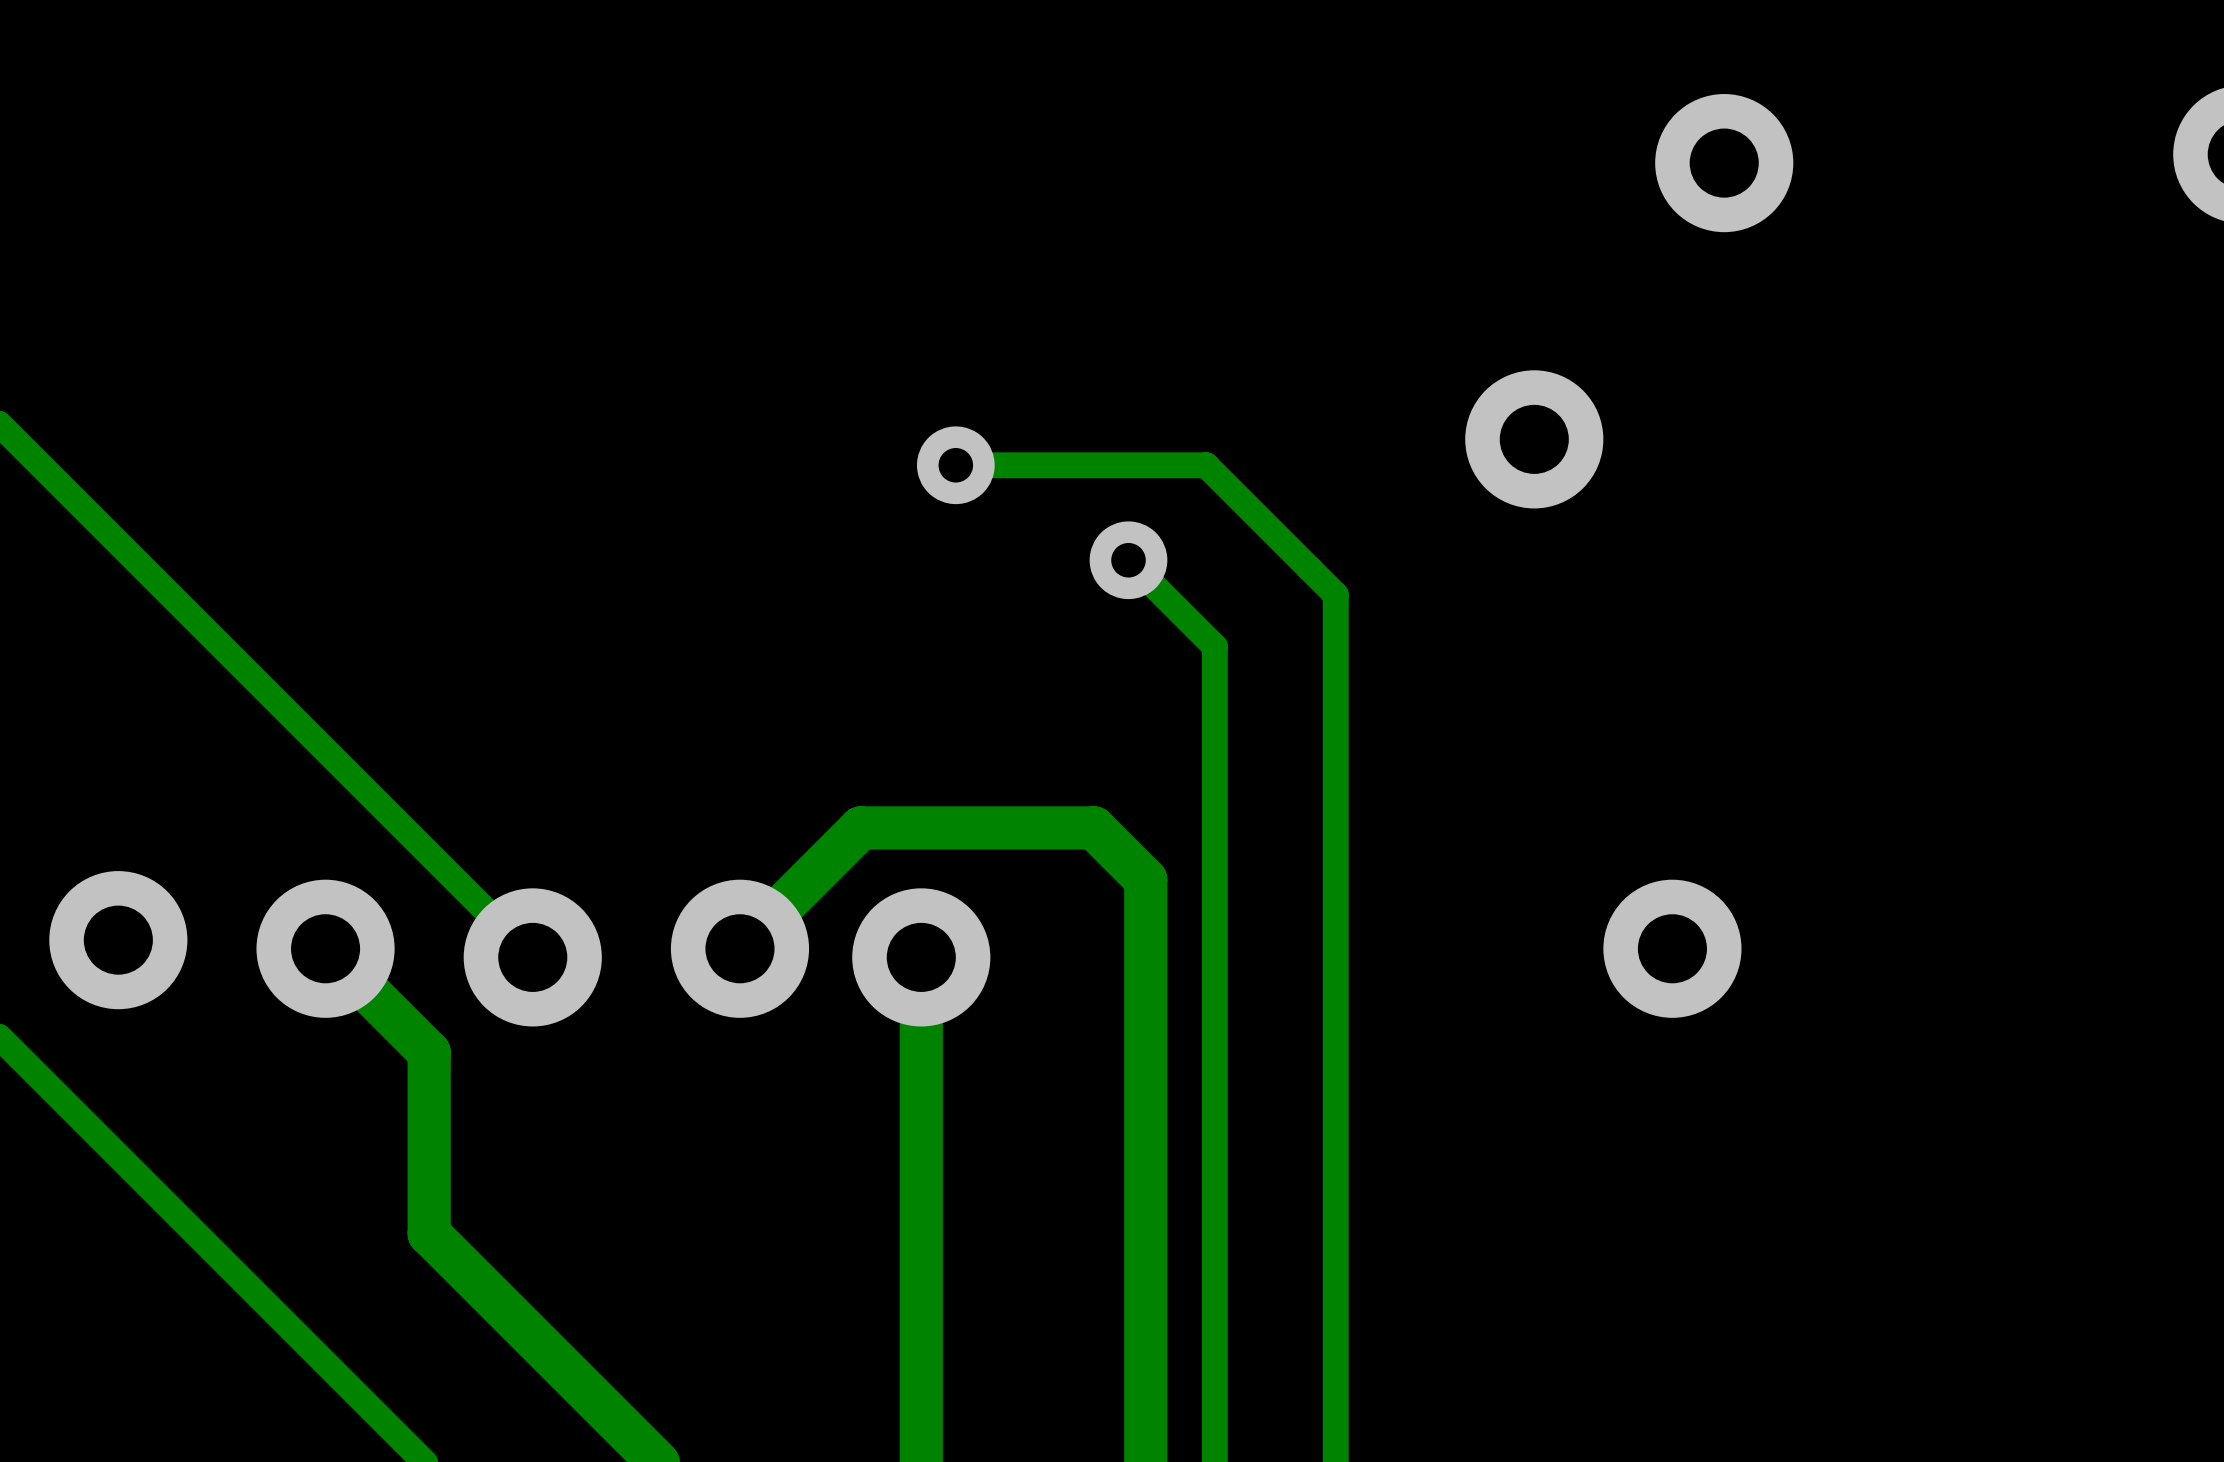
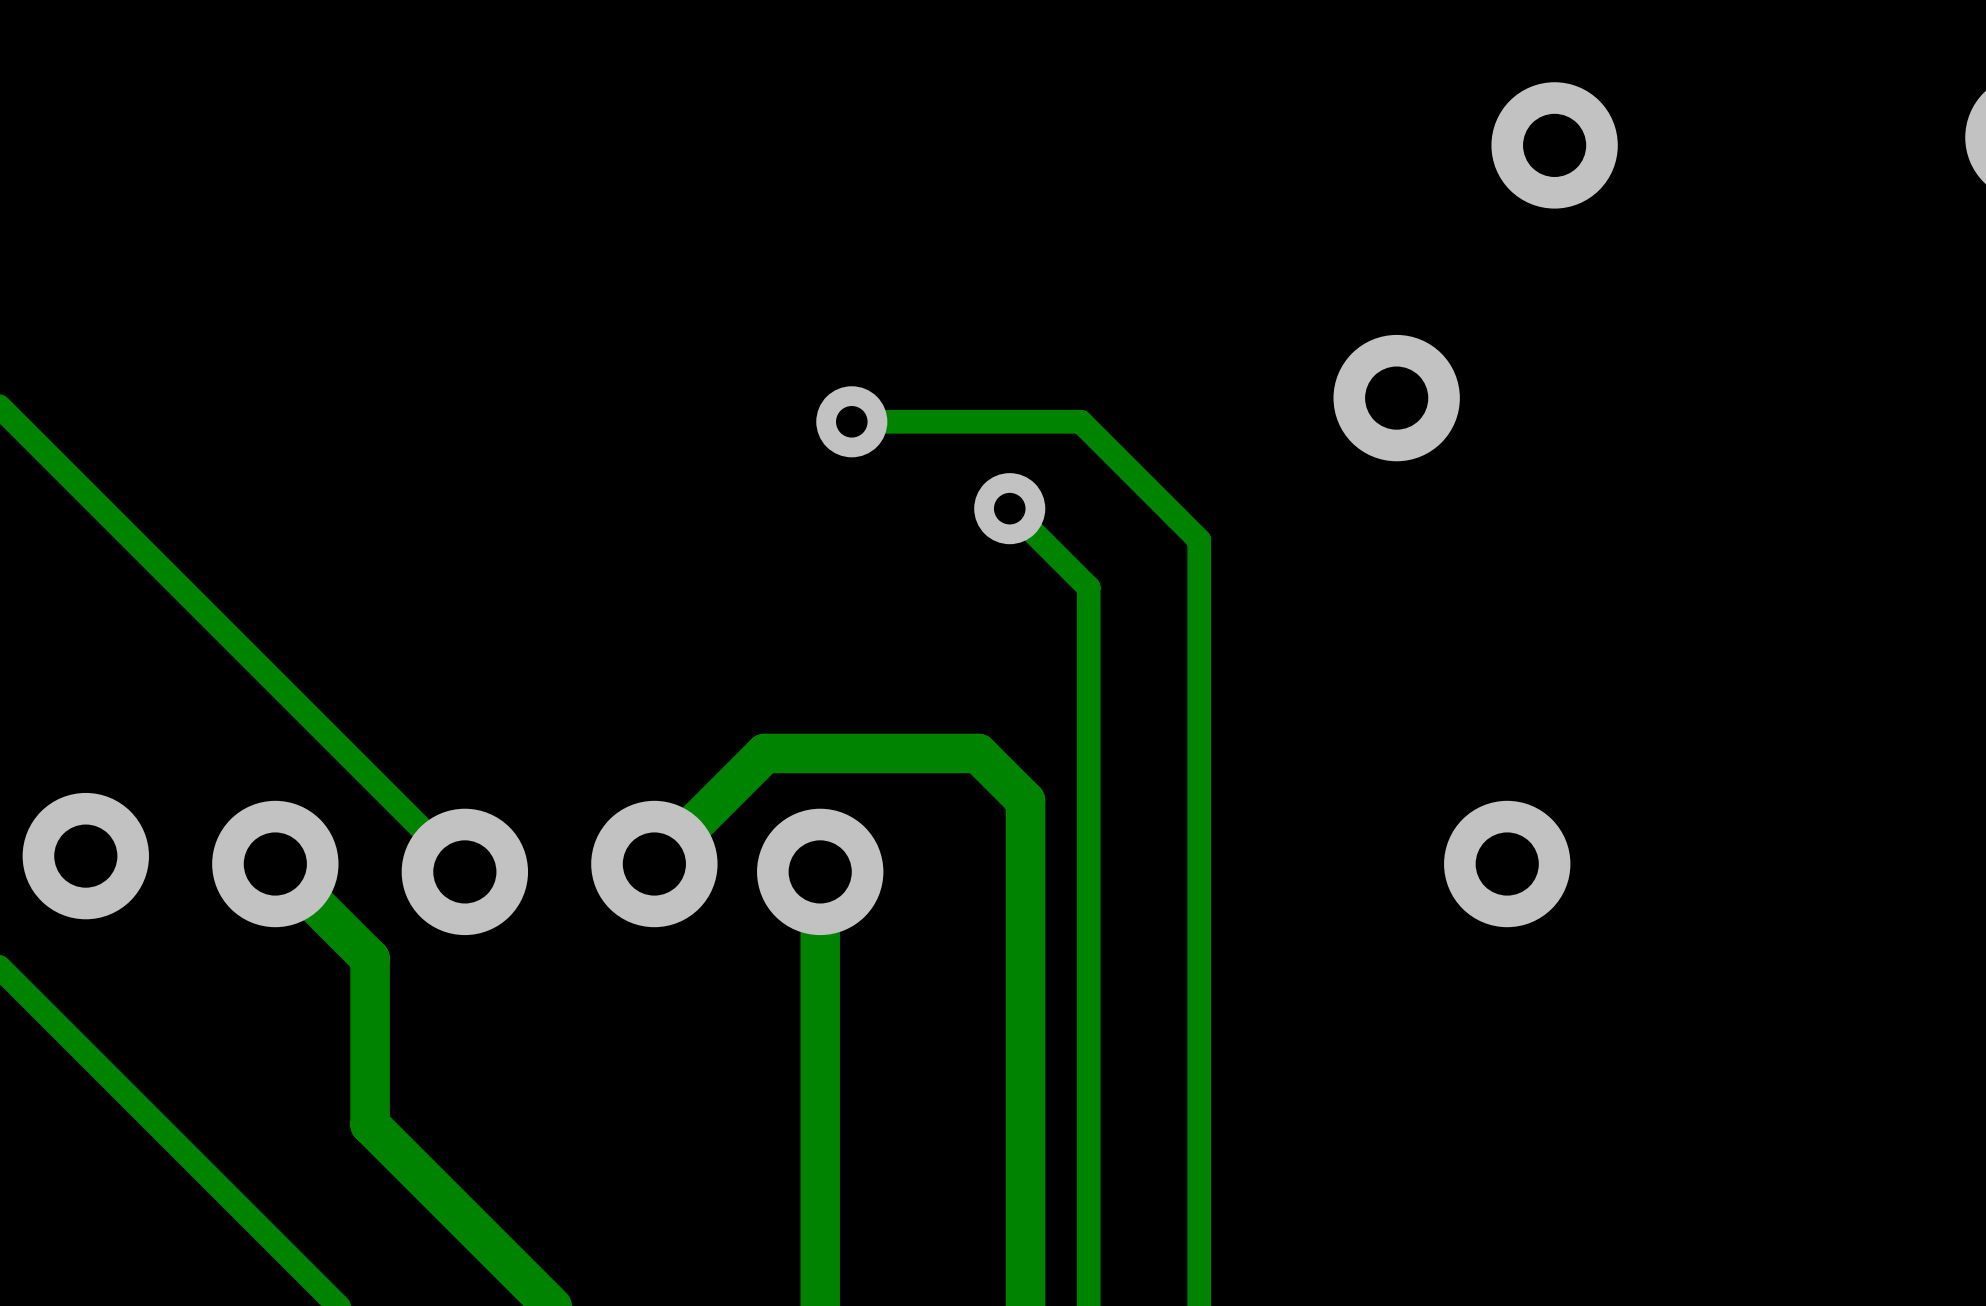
via position: (1534, 439) -> (1396, 398)

